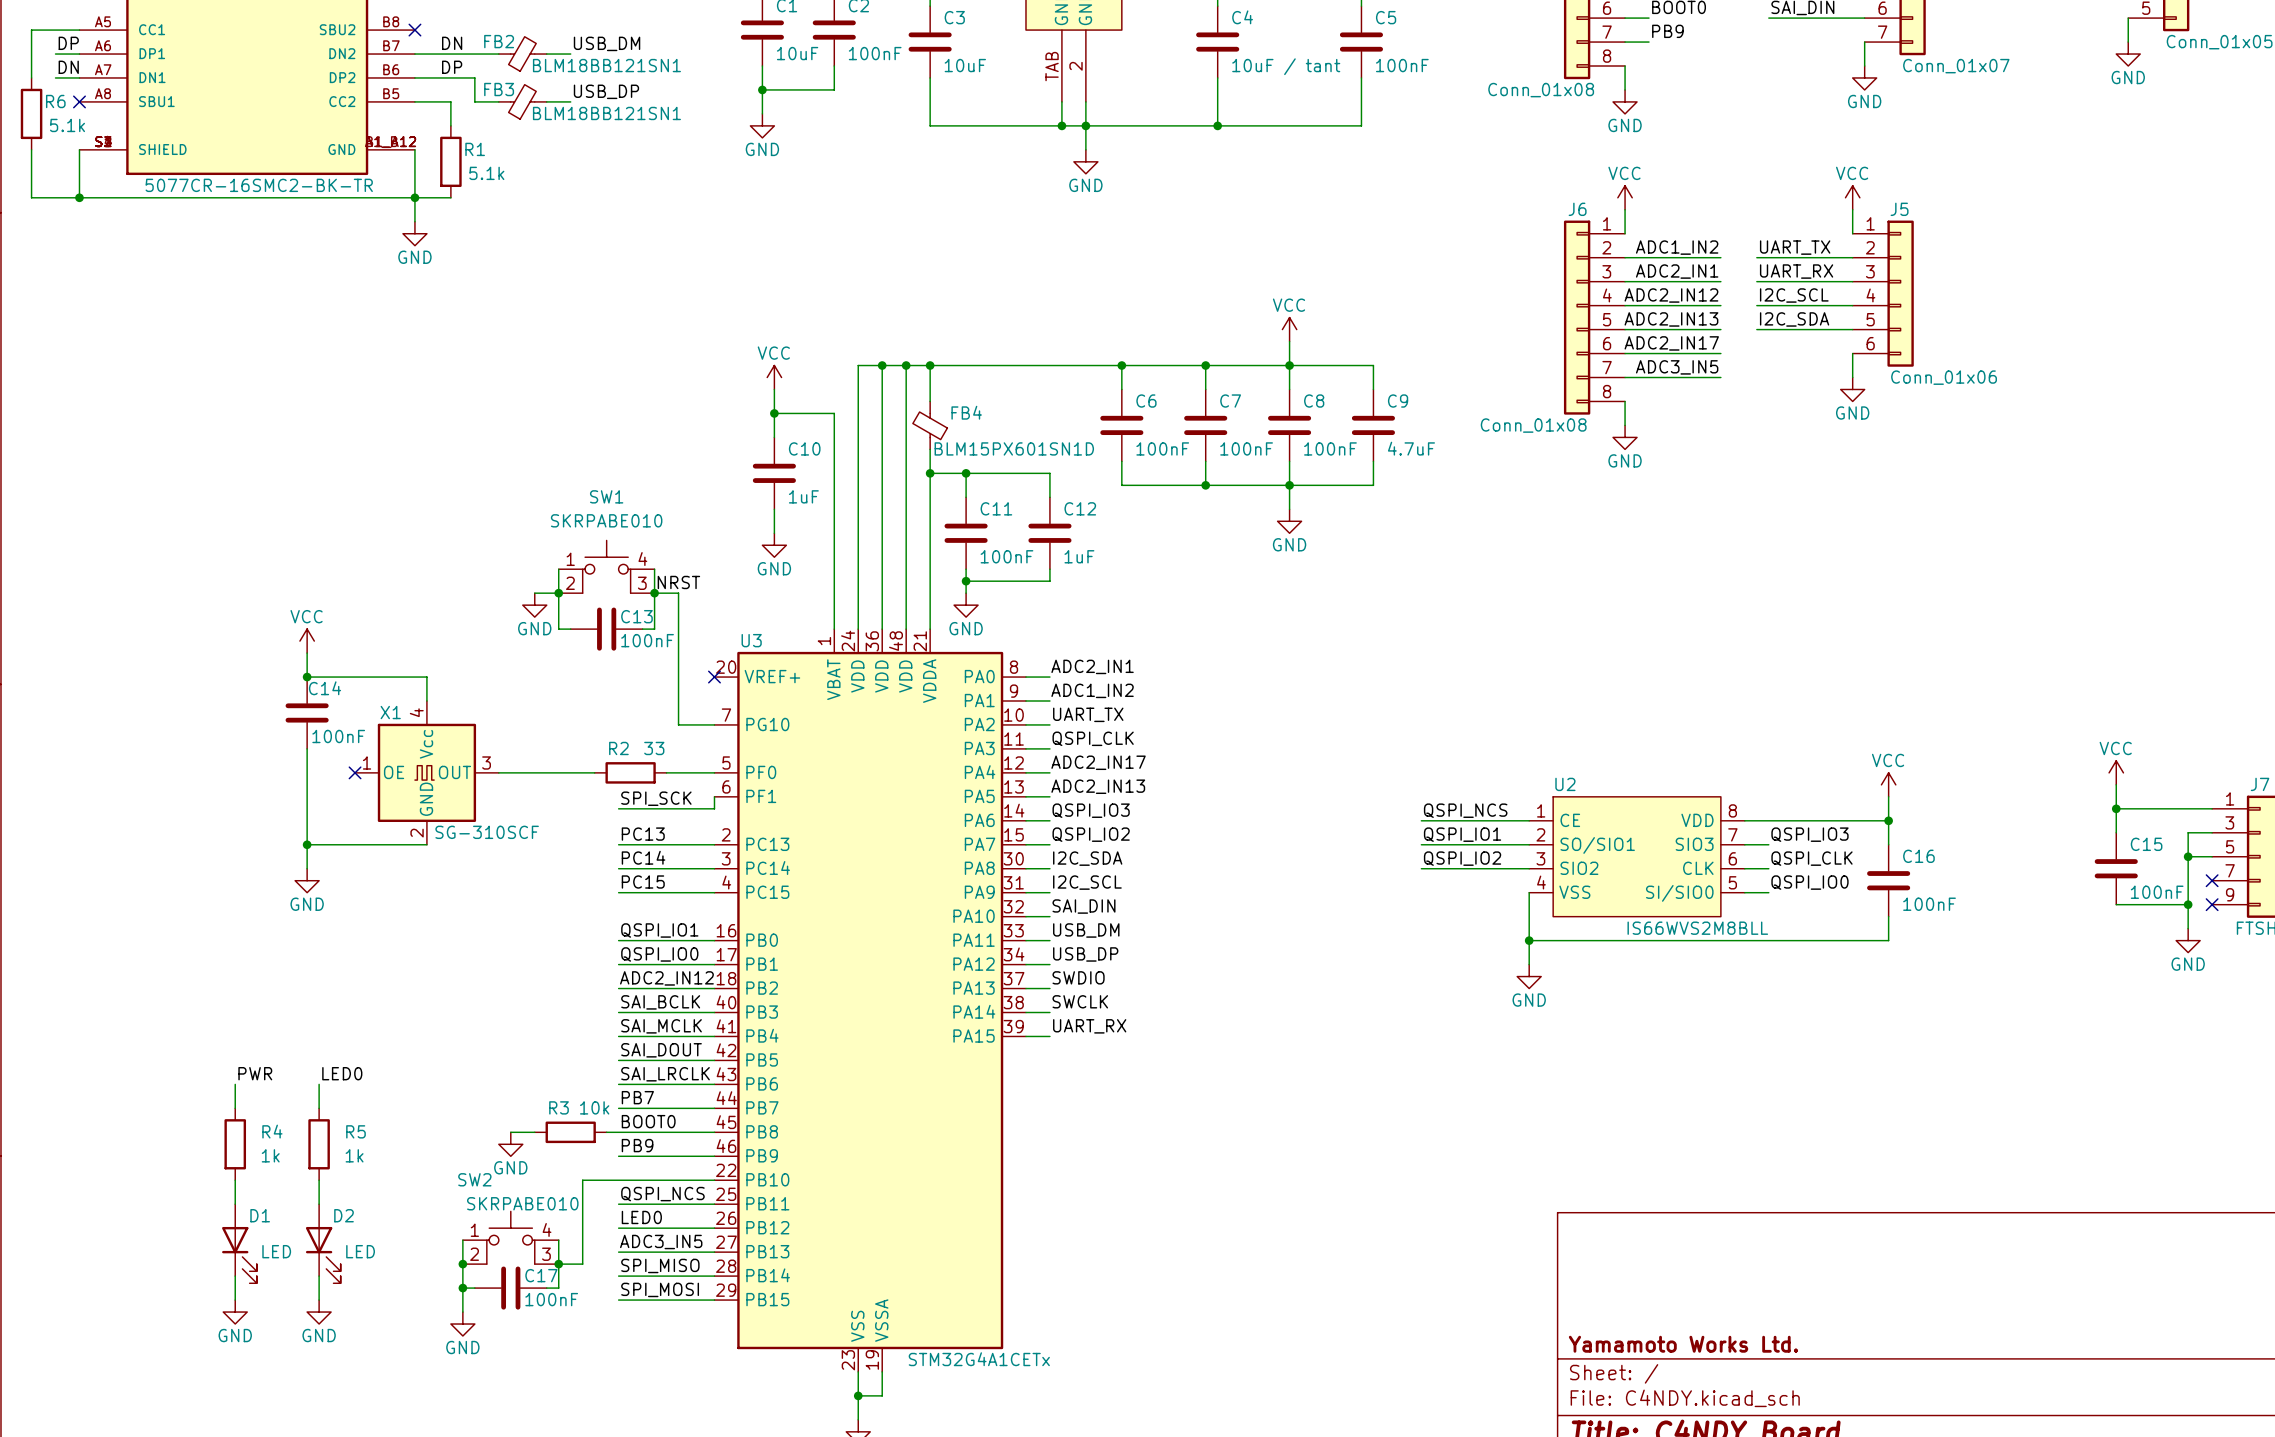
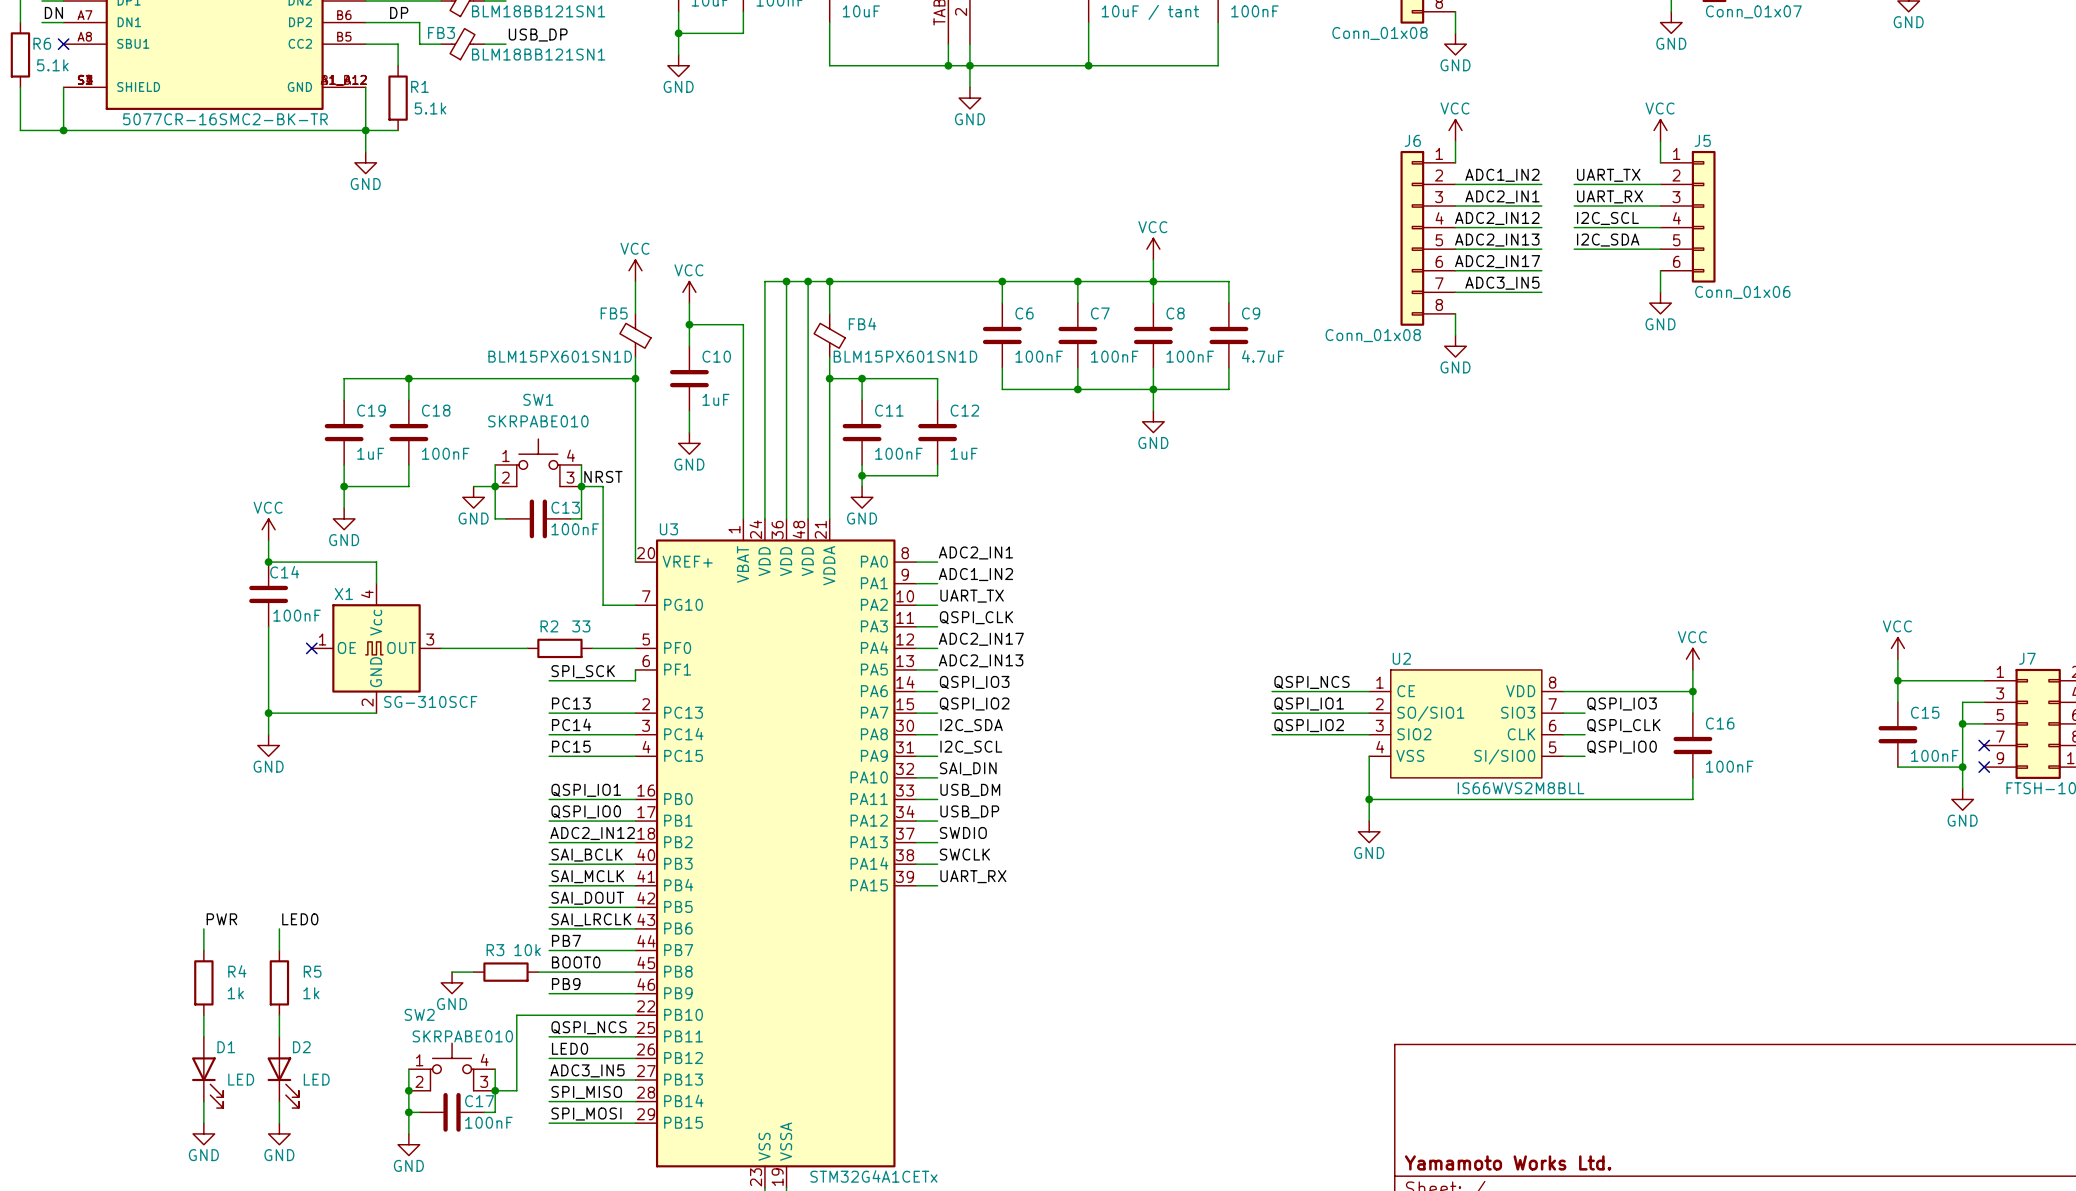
power symbol: none -> VCC (635, 270)
wire: none -> (635, 281) (635, 313)
FB5: none -> BLM15PX601SN1D (635, 335)
wire: none -> (635, 357) (635, 562)
wire: none -> (408, 378) (408, 400)
junction: none -> (408, 378)
wire: none -> (635, 378) (344, 378) (344, 400)
junction: none -> (635, 378)
C19: none -> 1uF (344, 432)
C18: none -> 100nF (408, 432)
wire: none -> (344, 464) (344, 508)
wire: none -> (408, 464) (408, 486) (344, 486)
junction: none -> (344, 486)
power symbol: none -> GND (344, 518)
no-connect mark: (714, 677) -> none

